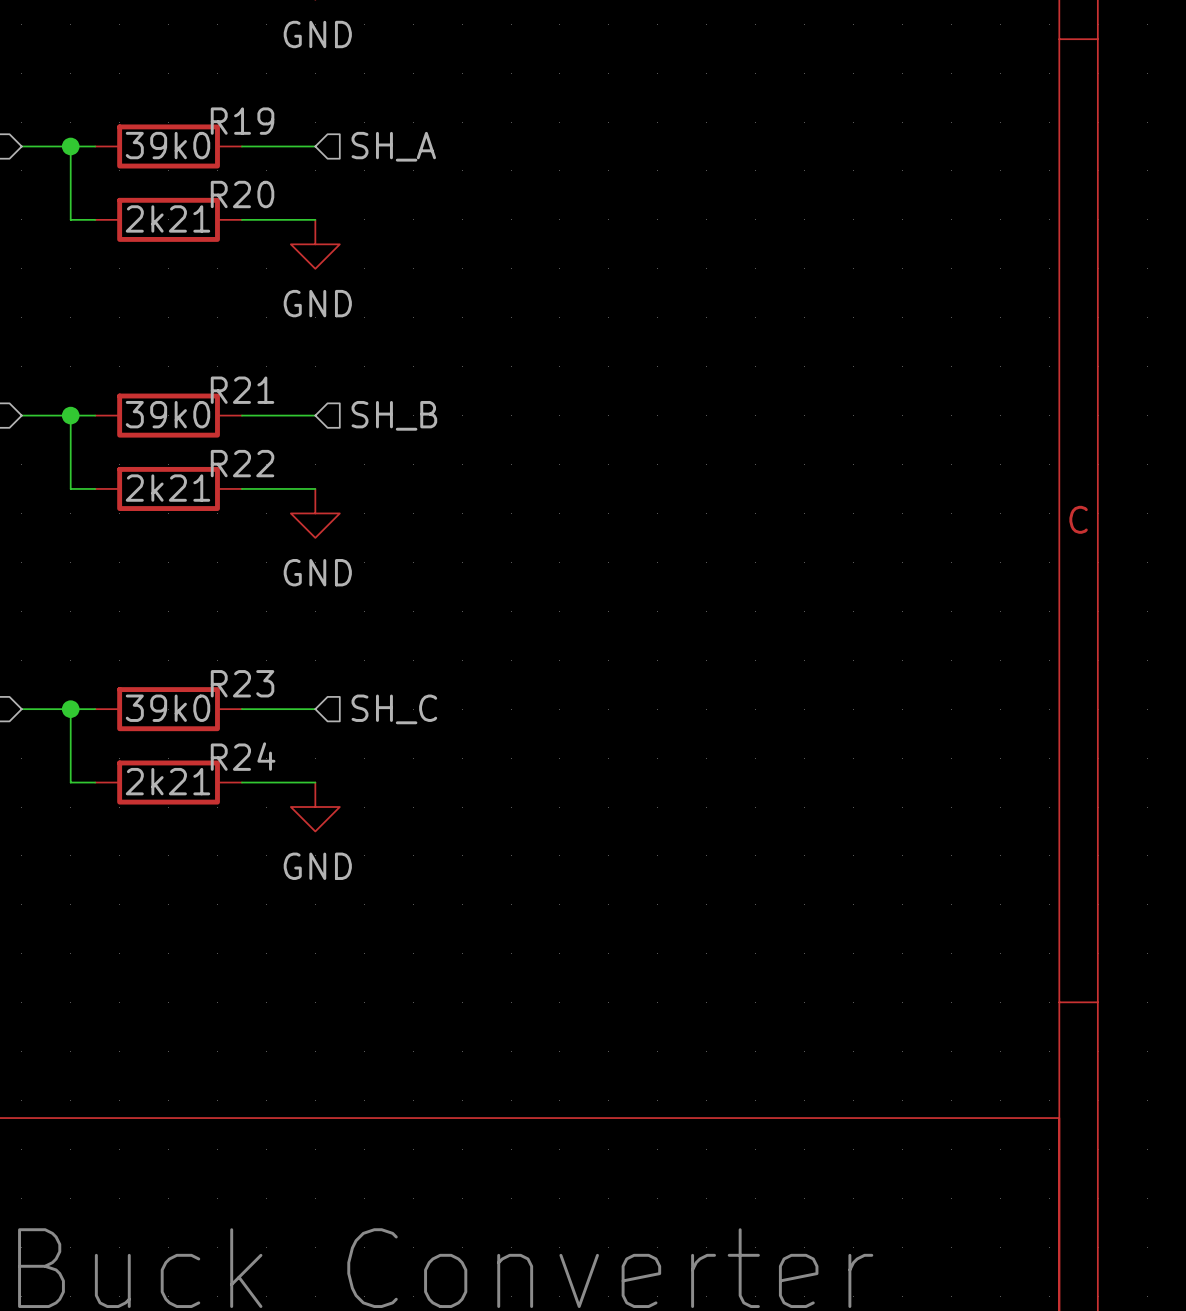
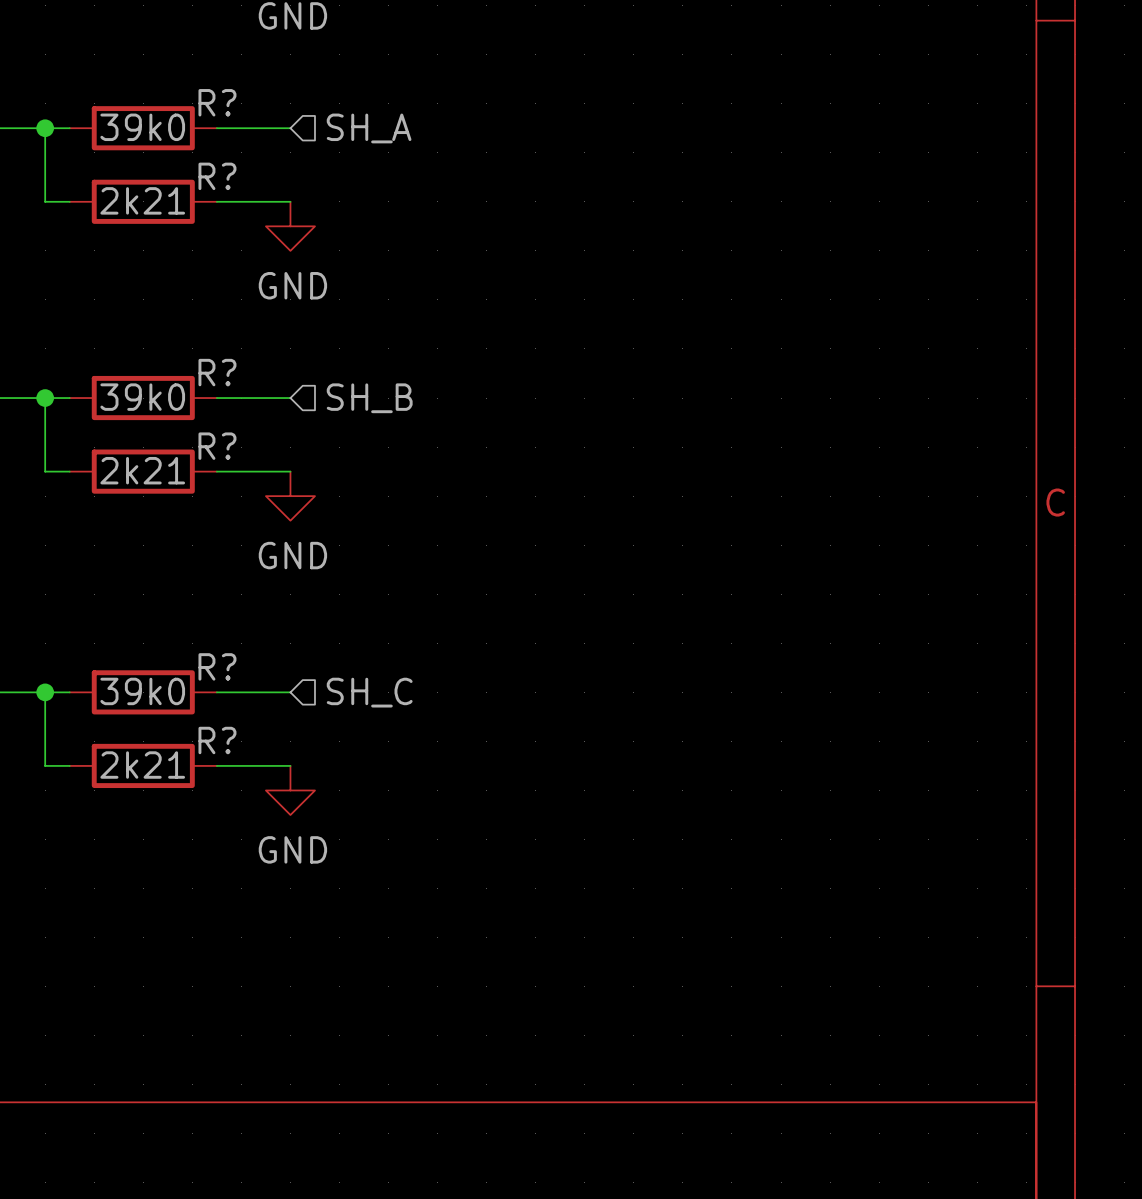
R19 name: R19 (242, 121) -> R? (217, 102)
R20 name: R20 (242, 194) -> R? (217, 176)
R21 name: R21 (242, 390) -> R? (217, 372)
R22 name: R22 (242, 463) -> R? (217, 446)
R23 name: R23 (242, 683) -> R? (217, 666)
R24 name: R24 (243, 756) -> R? (217, 740)

